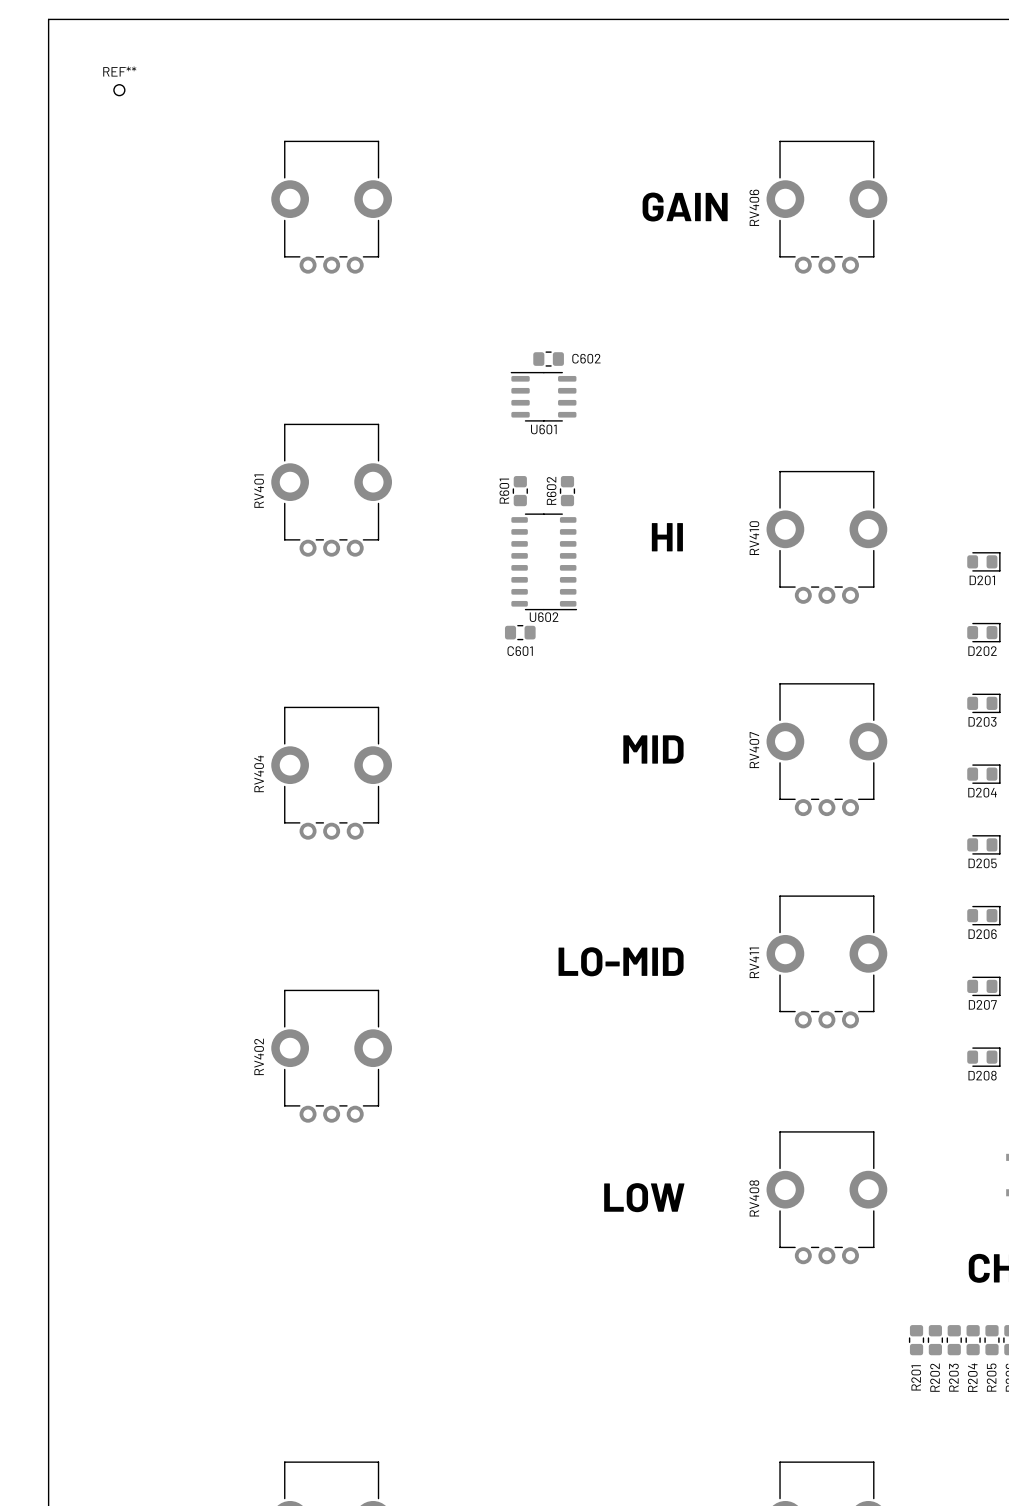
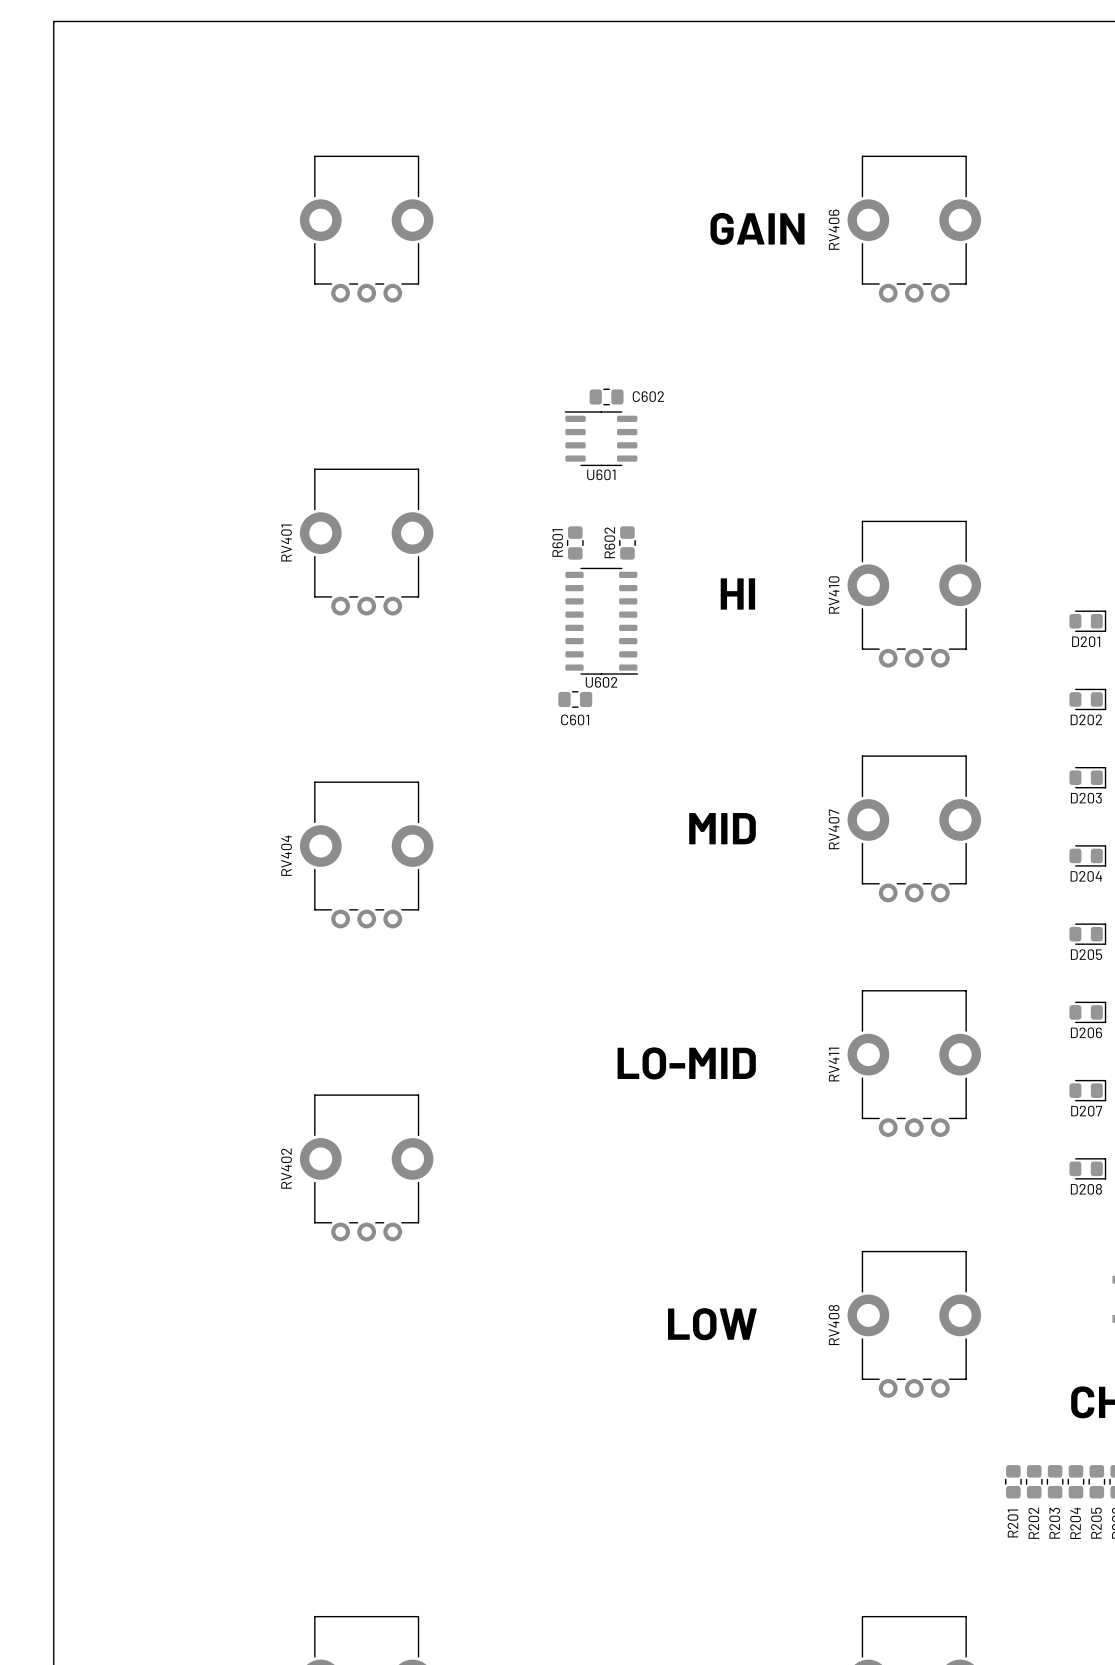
REF**: (119, 90) -> none

